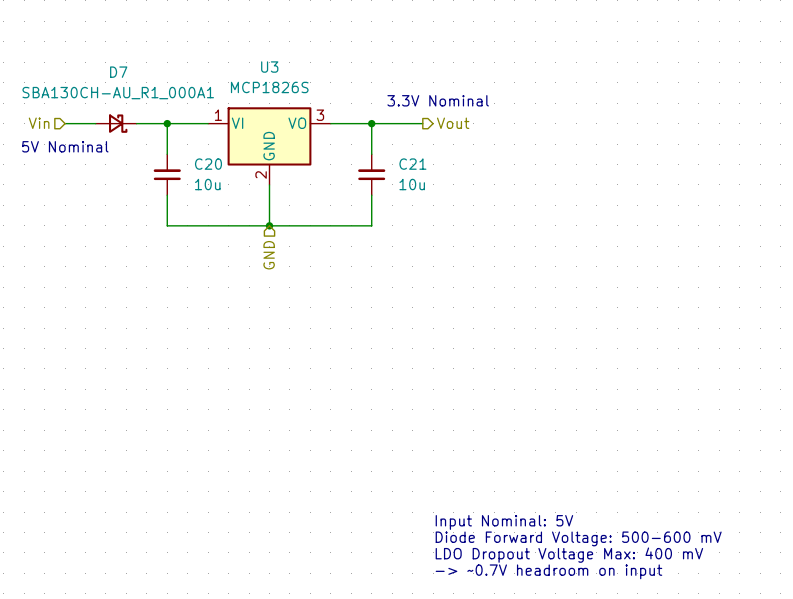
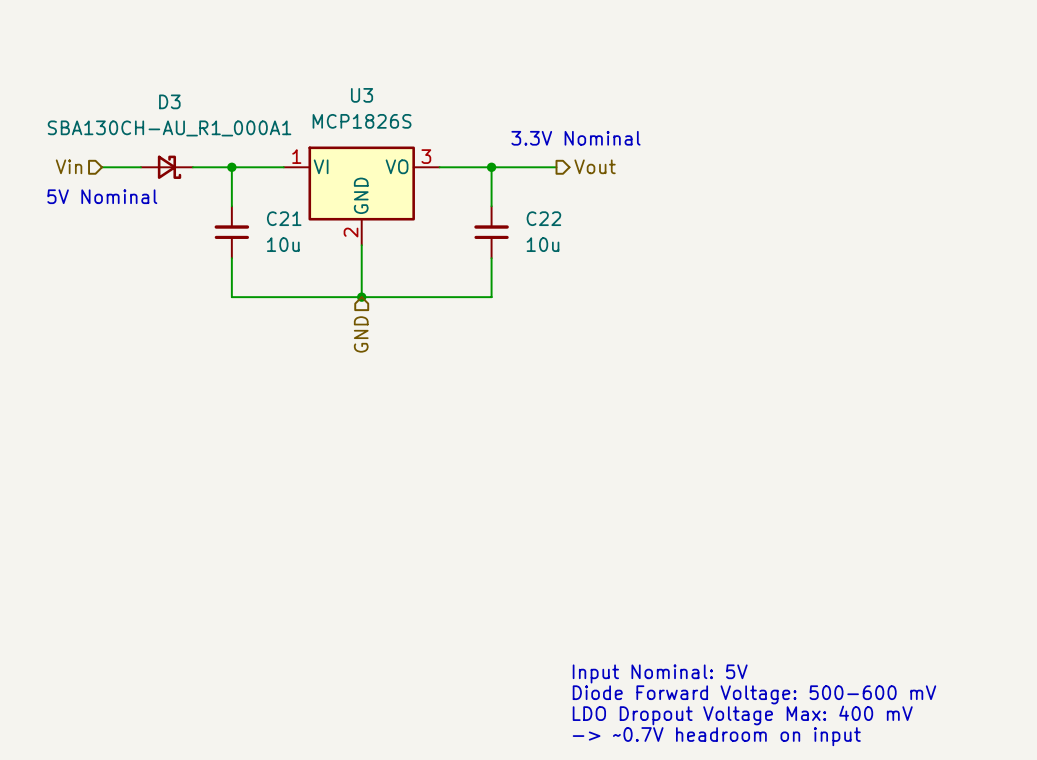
D7 name: D7 (118, 72) -> D3 (169, 101)
C20 name: C20 (208, 164) -> C21 (284, 218)
C21 name: C21 (412, 164) -> C22 (543, 218)

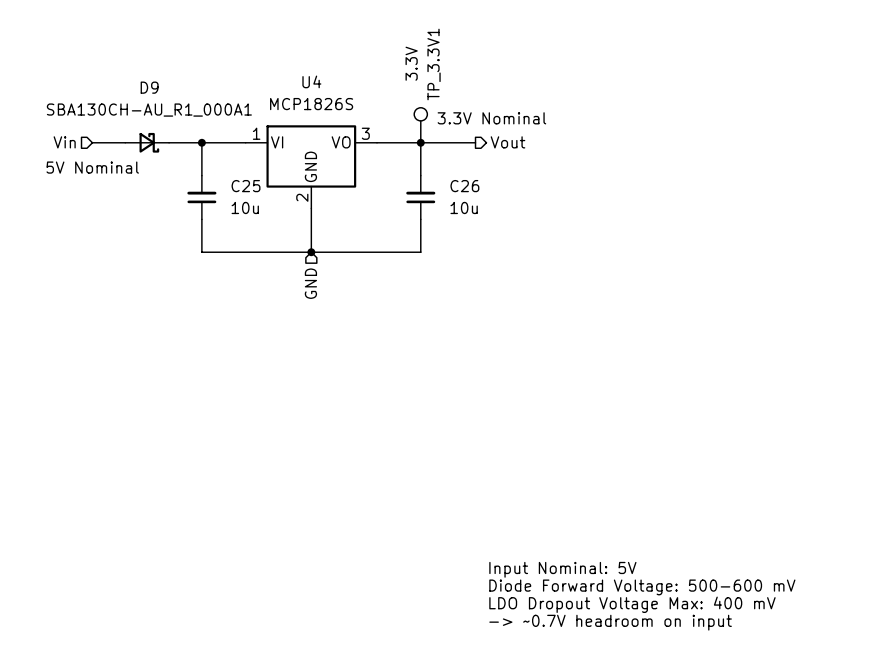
U3 name: U3 (362, 95) -> U4 (311, 81)
D3 name: D3 (169, 101) -> D9 (149, 87)
TP_3.3V1: none -> 3.3V (420, 125)
C21 name: C21 (284, 218) -> C25 (246, 186)
C22 name: C22 (543, 218) -> C26 (464, 186)

